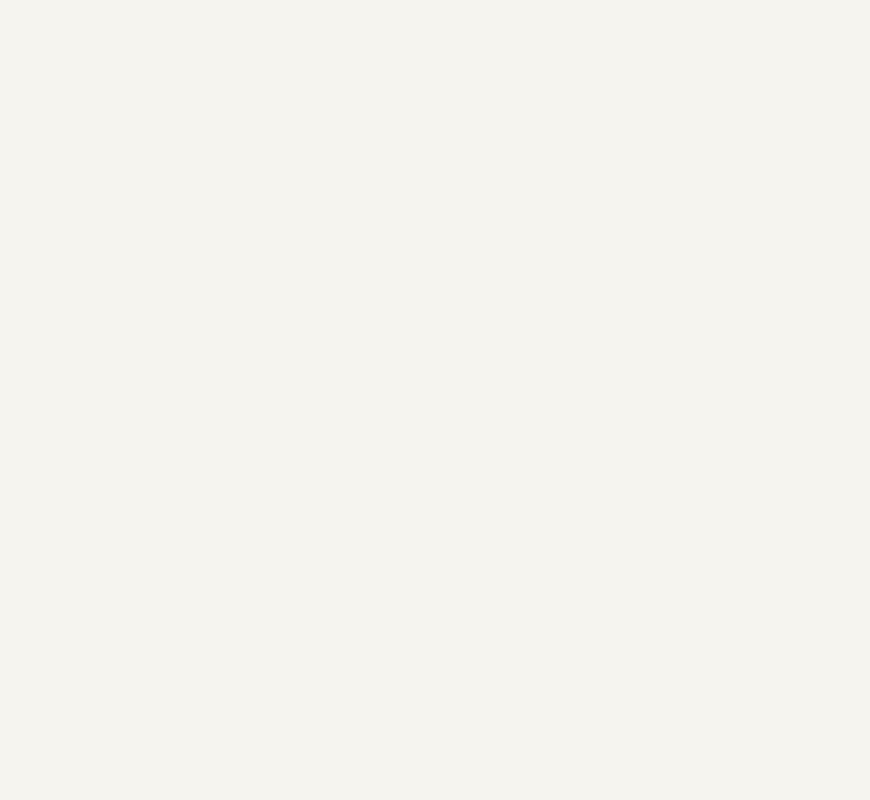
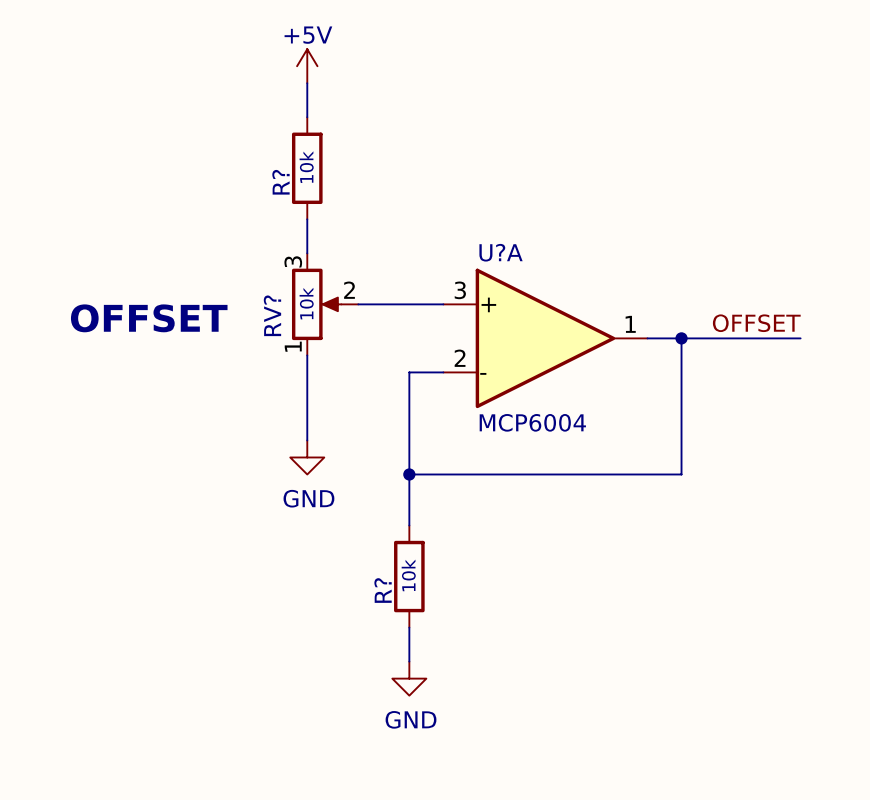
power symbol: none -> +5V (307, 66)
wire: none -> (307, 83) (307, 117)
R?: none -> 10k (307, 168)
wire: none -> (307, 219) (307, 253)
RV?: none -> 10k (325, 304)
wire: none -> (358, 304) (443, 304)
text: none -> OFFSET (149, 318)
label: none -> OFFSET (756, 323)
U?A: none -> MCP6004 (545, 338)
wire: none -> (647, 338) (800, 338)
wire: none -> (681, 338) (681, 474) (409, 474)
junction: none -> (681, 338)
wire: none -> (307, 355) (307, 440)
wire: none -> (443, 372) (409, 372) (409, 525)
power symbol: none -> GND (307, 457)
junction: none -> (409, 474)
R?: none -> 10k (409, 576)
wire: none -> (409, 627) (409, 661)
power symbol: none -> GND (409, 678)

